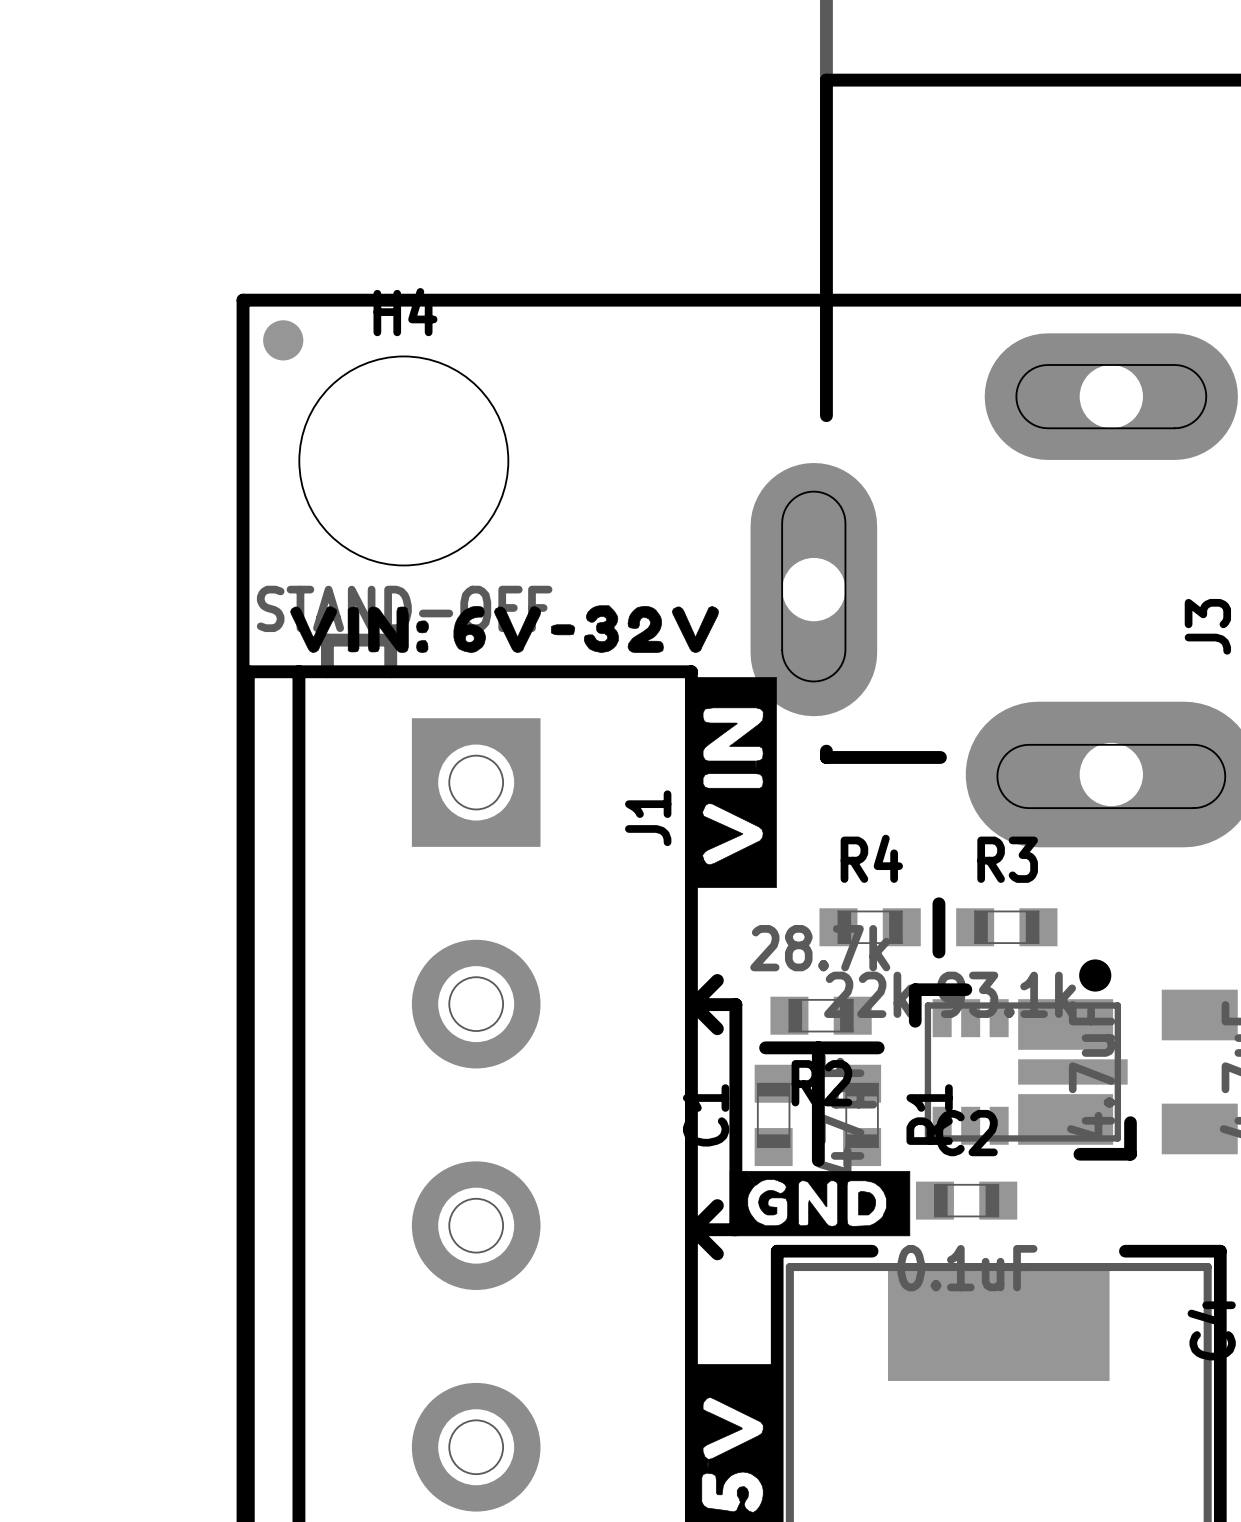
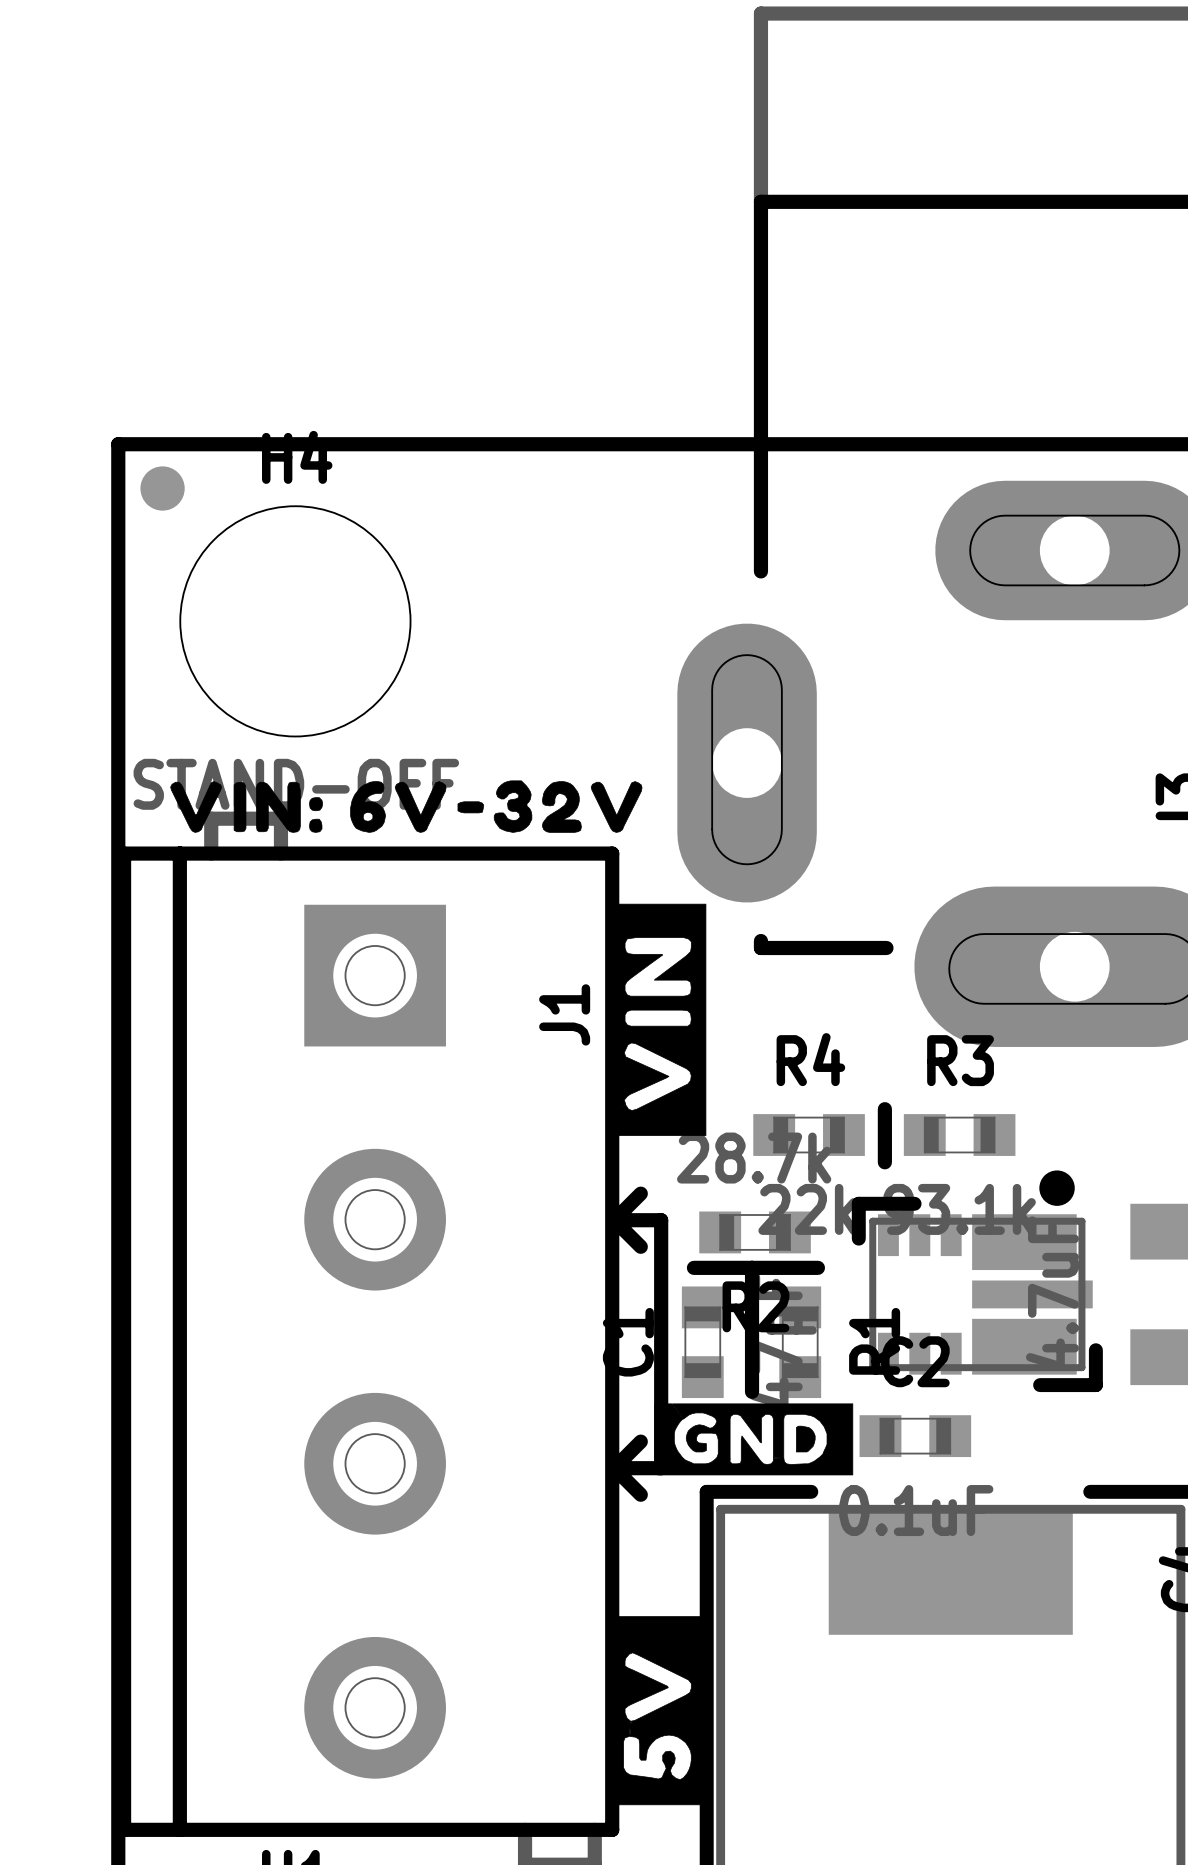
drawing position: (733, 782) -> (658, 1019)

